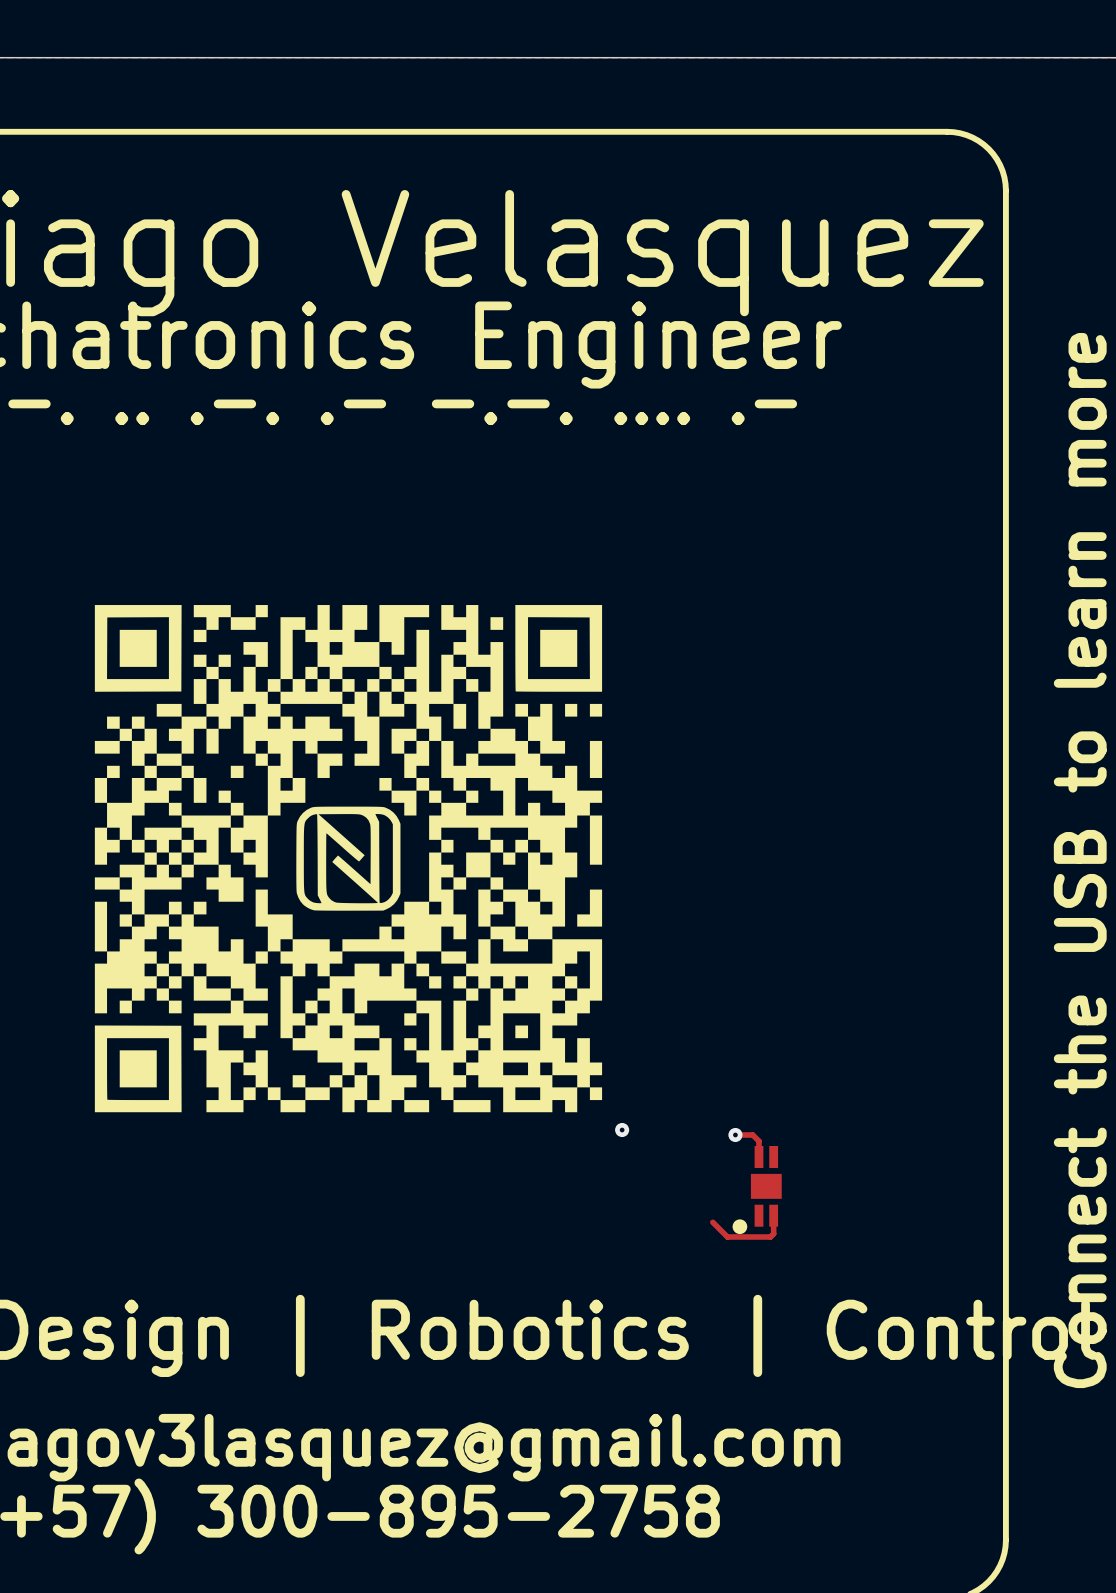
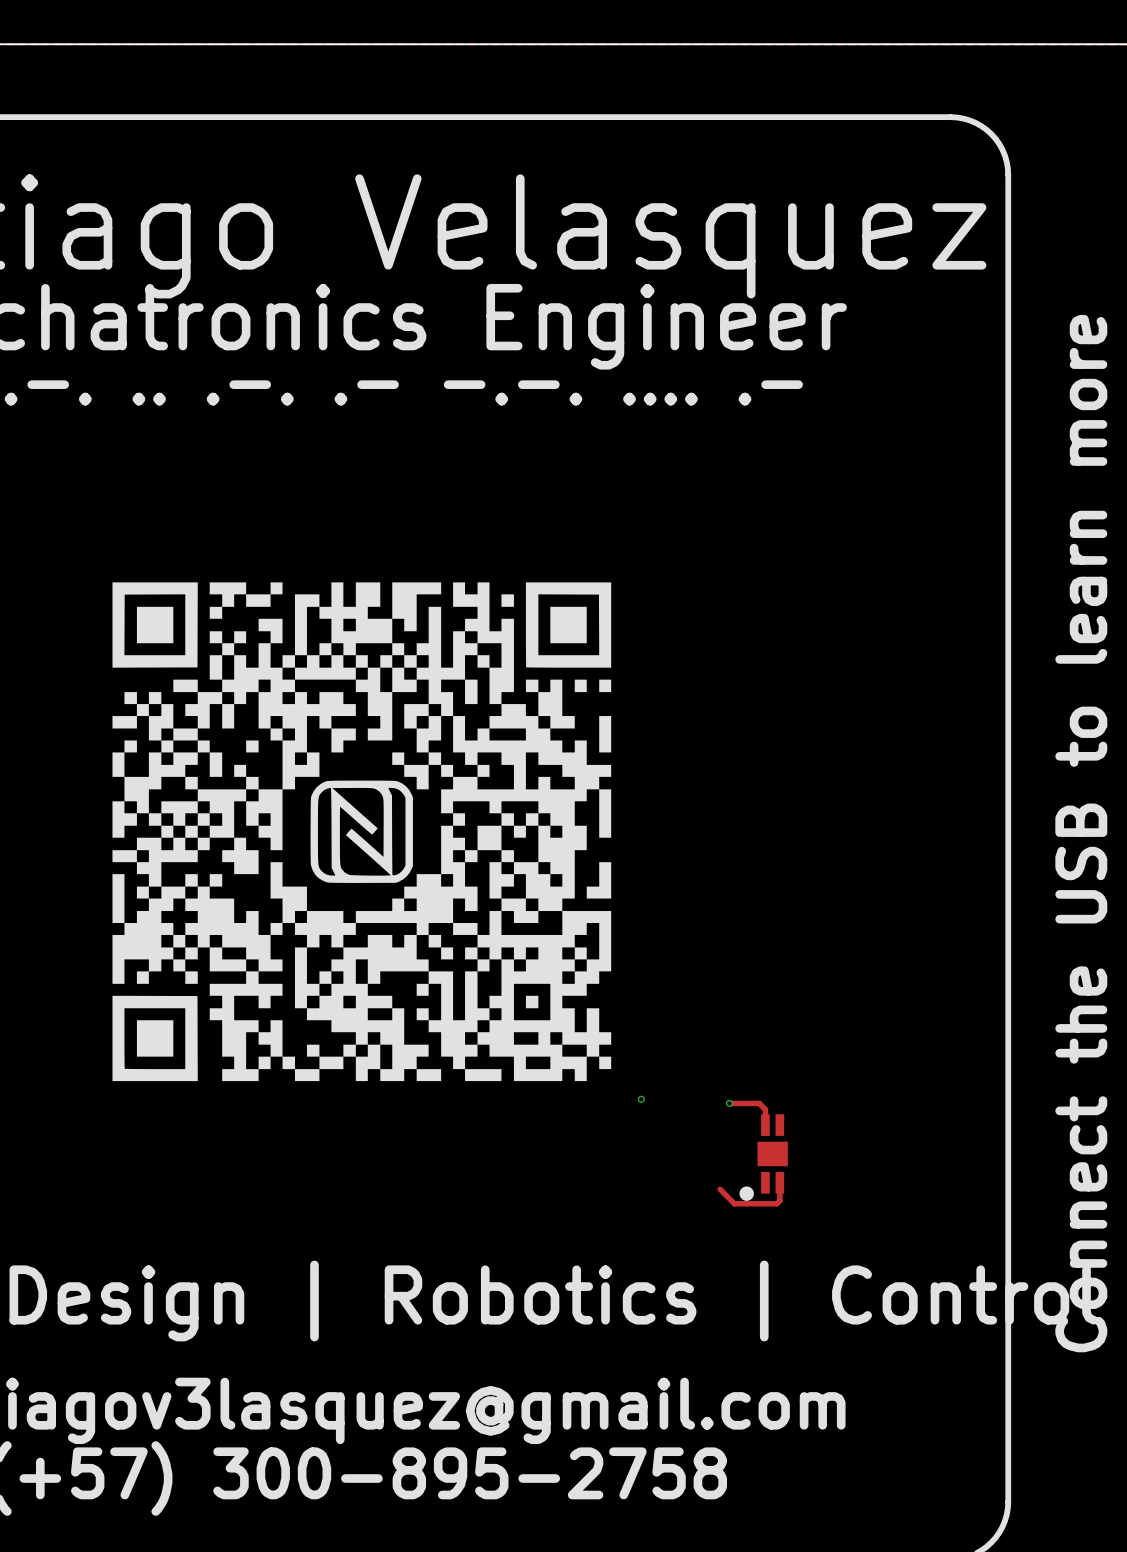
via size: [615, 1122, 630, 1138] -> [637, 1095, 645, 1103]
track: none -> (729, 1103) (742, 1103)
via: none -> (729, 1103)
via: (735, 1134) -> none

